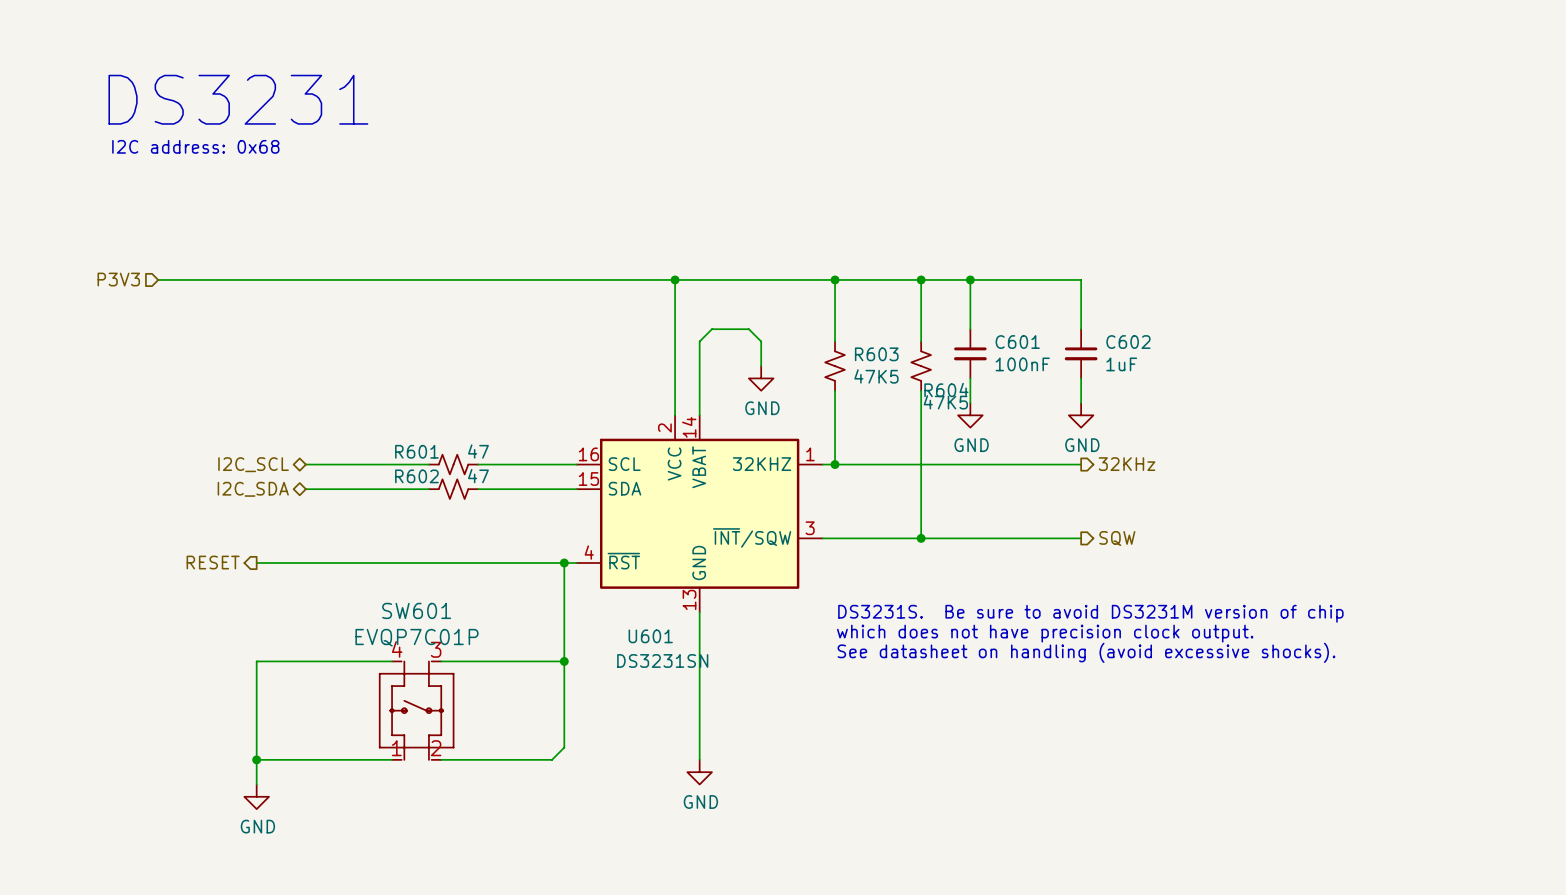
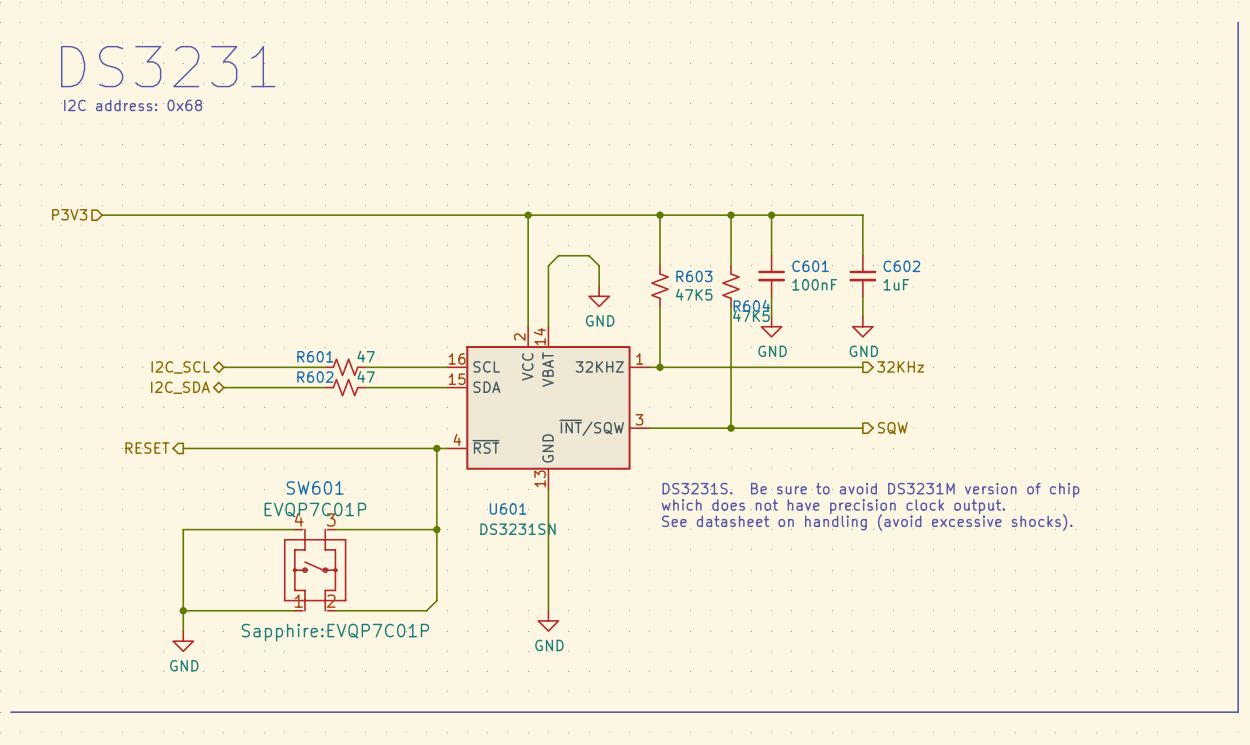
line: none -> (1238, 22) (1238, 712) (10, 712)
SW601 text: none -> Sapphire:EVQP7C01P (335, 632)

